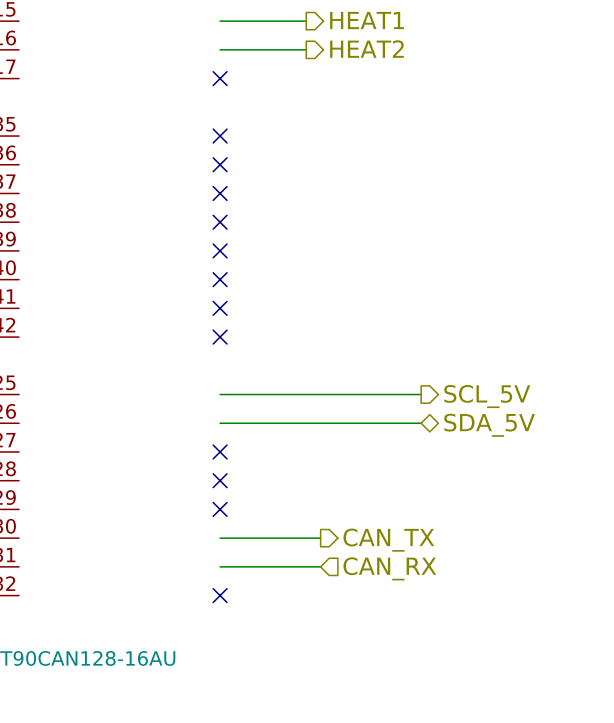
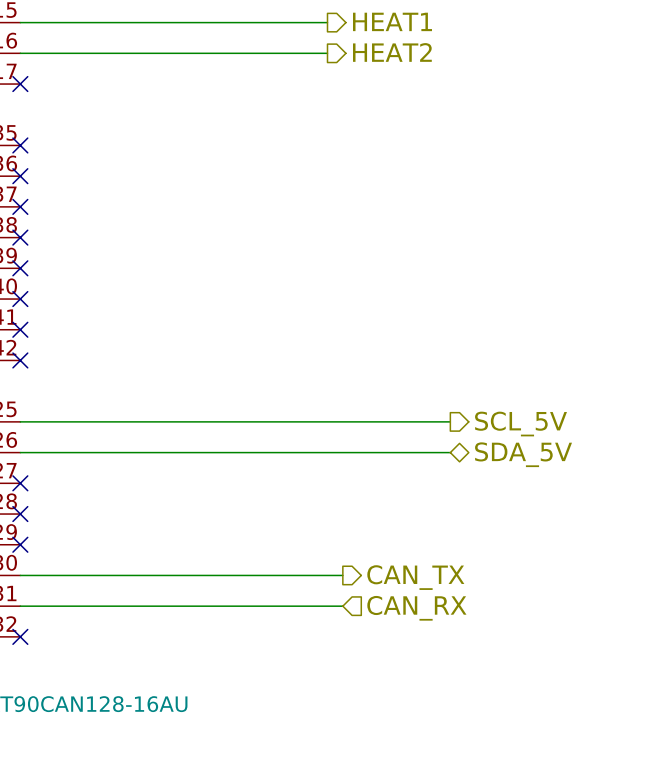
wire: none -> (20, 22) (235, 22)
wire: none -> (20, 53) (235, 53)
no-connect mark: none -> (20, 84)
no-connect mark: (220, 78) -> none
no-connect mark: none -> (20, 145)
no-connect mark: (220, 136) -> none
no-connect mark: none -> (20, 176)
no-connect mark: (220, 164) -> none
no-connect mark: none -> (20, 206)
no-connect mark: (220, 193) -> none
no-connect mark: none -> (20, 237)
no-connect mark: (220, 222) -> none
no-connect mark: none -> (20, 268)
no-connect mark: (220, 250) -> none
no-connect mark: none -> (20, 299)
no-connect mark: (220, 279) -> none
no-connect mark: none -> (20, 329)
no-connect mark: (220, 308) -> none
no-connect mark: none -> (20, 360)
no-connect mark: (220, 337) -> none
wire: none -> (20, 421) (235, 421)
wire: none -> (20, 452) (235, 452)
no-connect mark: none -> (20, 483)
no-connect mark: (220, 451) -> none
no-connect mark: none -> (20, 514)
no-connect mark: (220, 480) -> none
no-connect mark: none -> (20, 544)
no-connect mark: (220, 509) -> none
wire: none -> (20, 575) (235, 575)
wire: none -> (20, 606) (235, 606)
no-connect mark: none -> (20, 636)
no-connect mark: (220, 595) -> none

